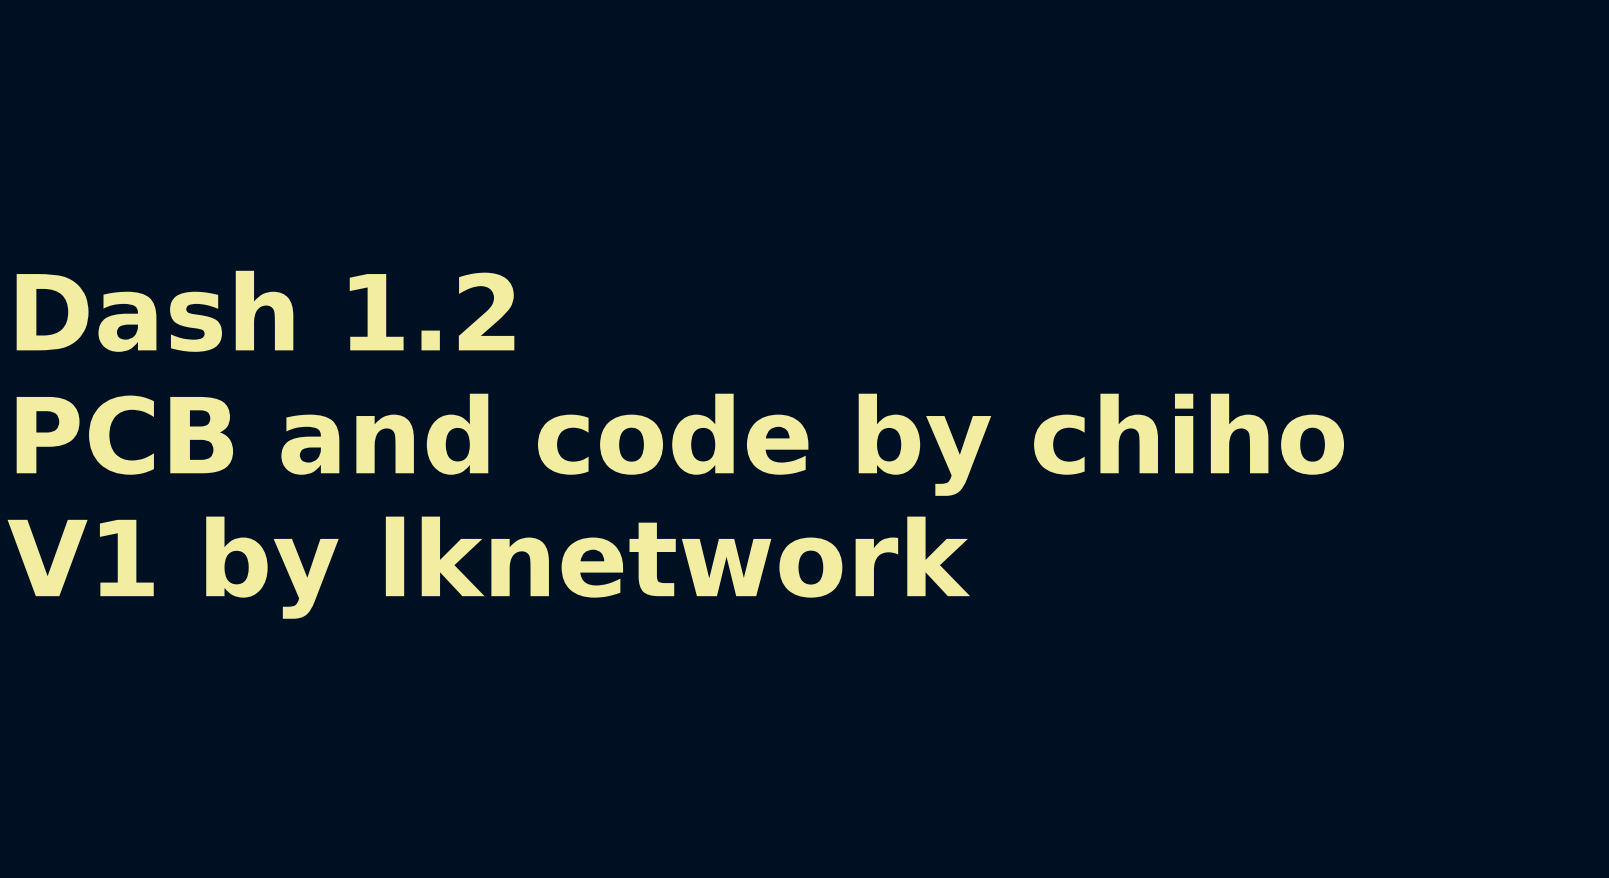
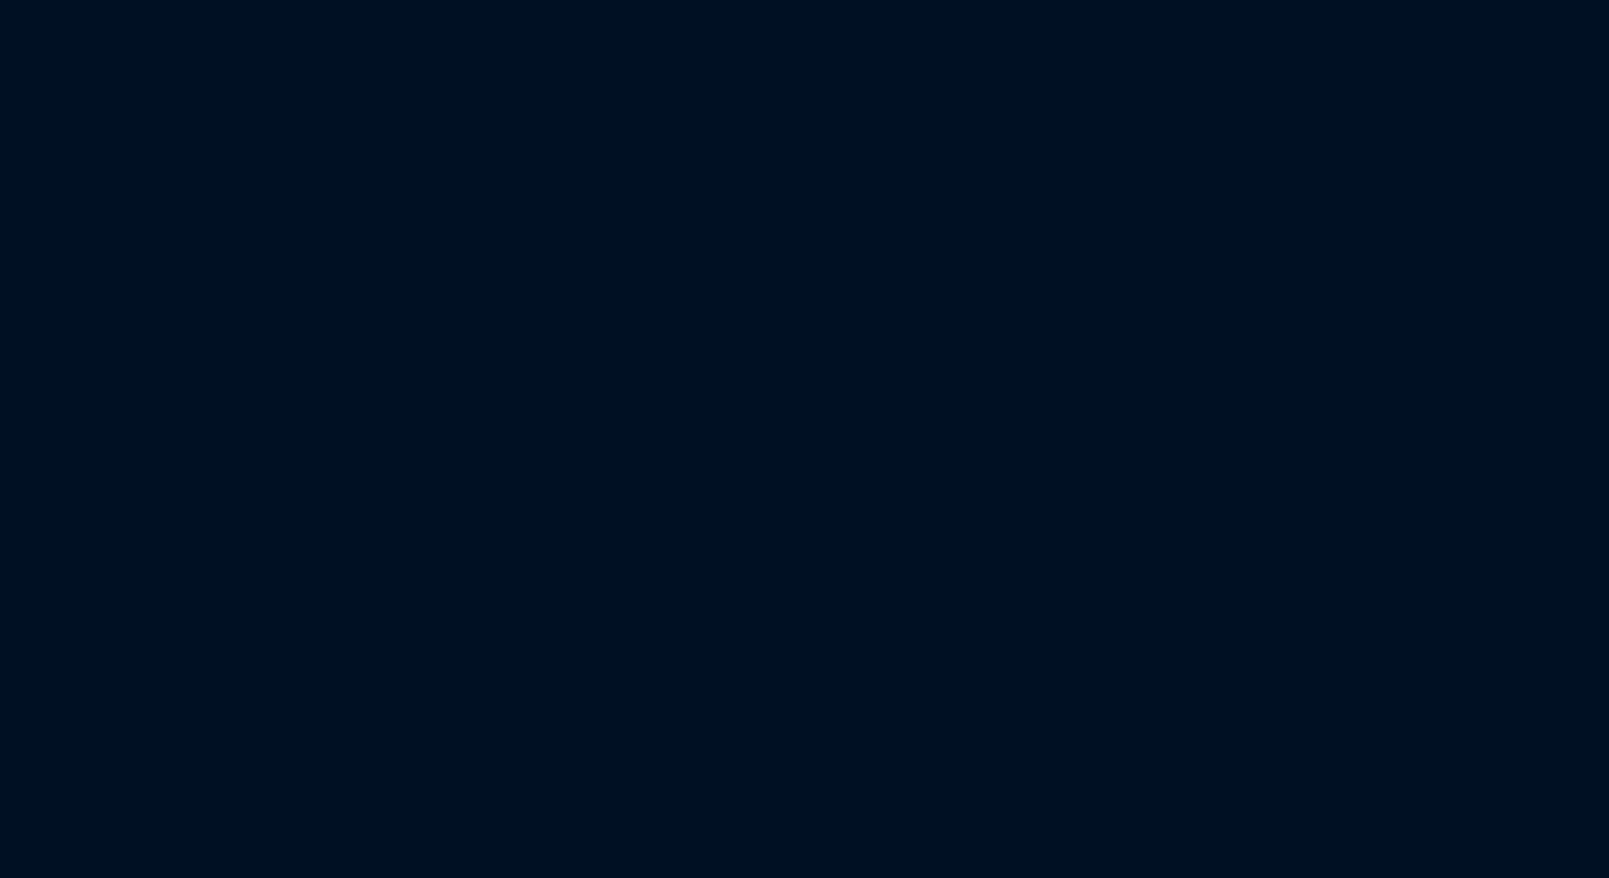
text: Dash 1.2 (265, 311) -> none
text: PCB and code by chiho (680, 444) -> none
text: V1 by lknetwork (488, 567) -> none

